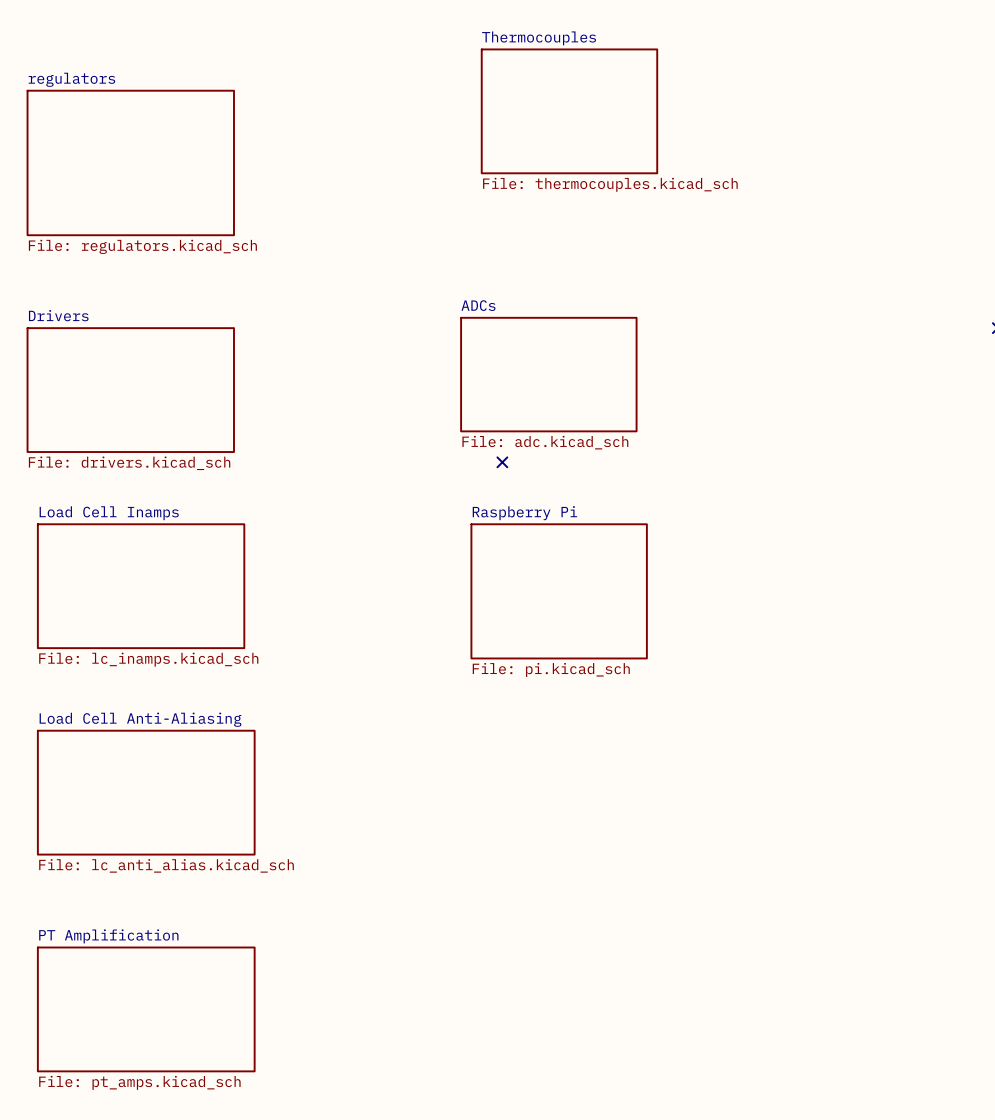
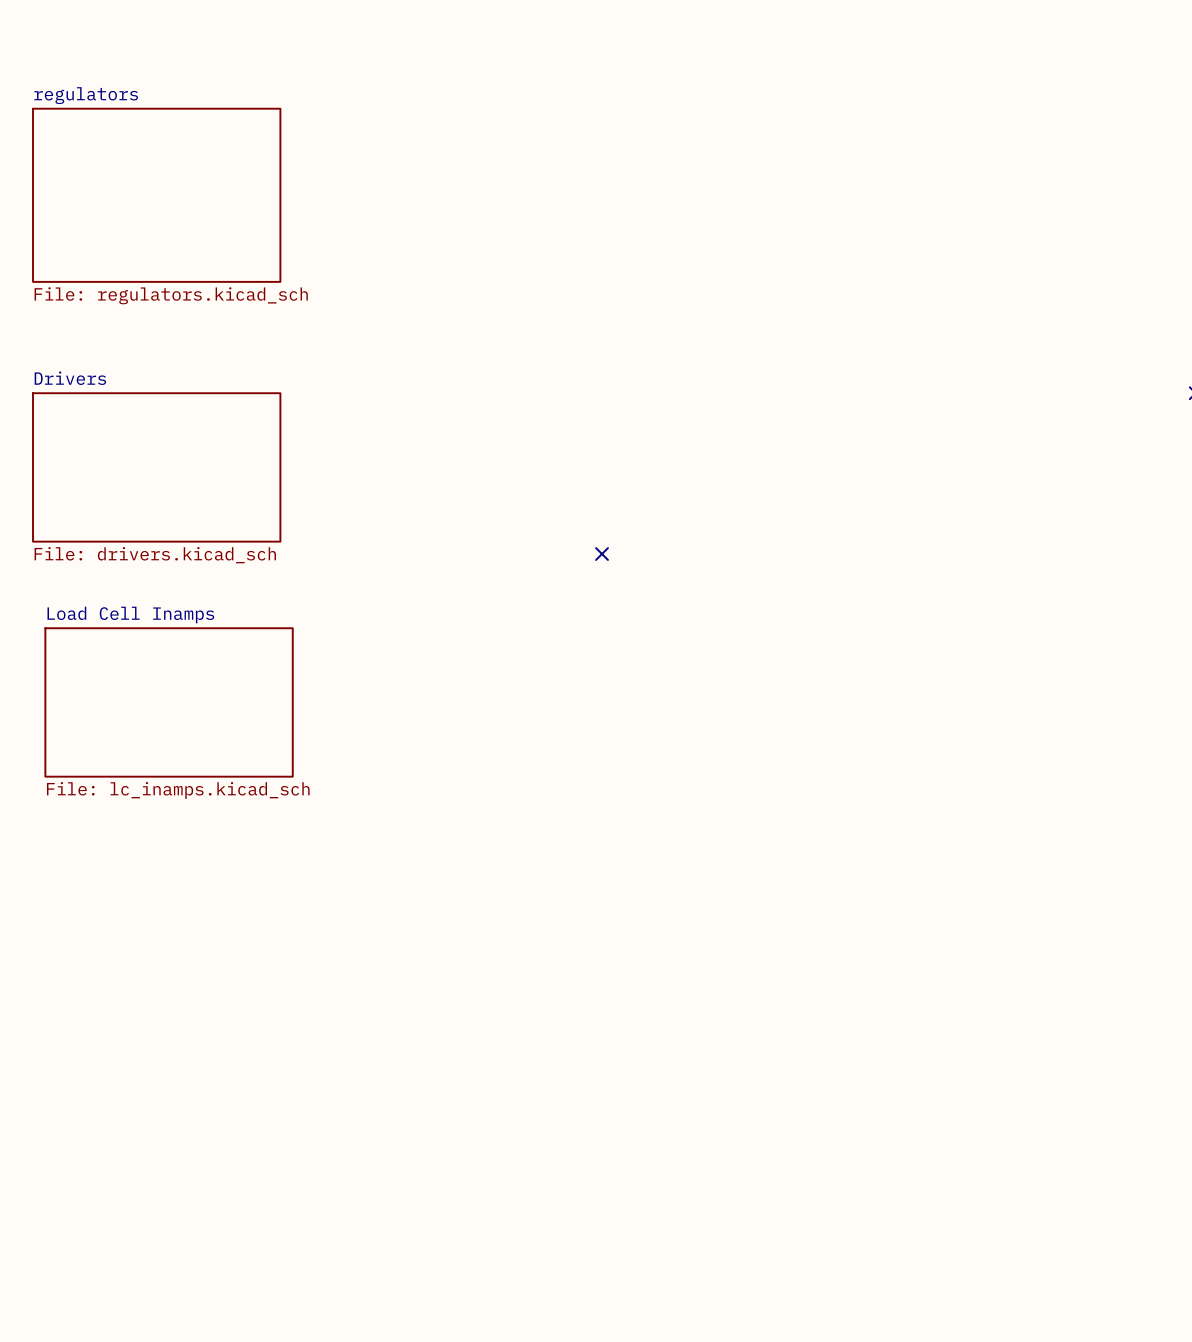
sheet Thermocouples: File: thermocouples.kicad_sch (569, 111) -> none
sheet ADCs: File: adc.kicad_sch (548, 374) -> none
sheet Raspberry Pi: File: pi.kicad_sch (559, 591) -> none
sheet Load Cell Anti-Aliasing: File: lc_anti_alias.kicad_sch (146, 792) -> none
sheet PT Amplification: File: pt_amps.kicad_sch (146, 1009) -> none

